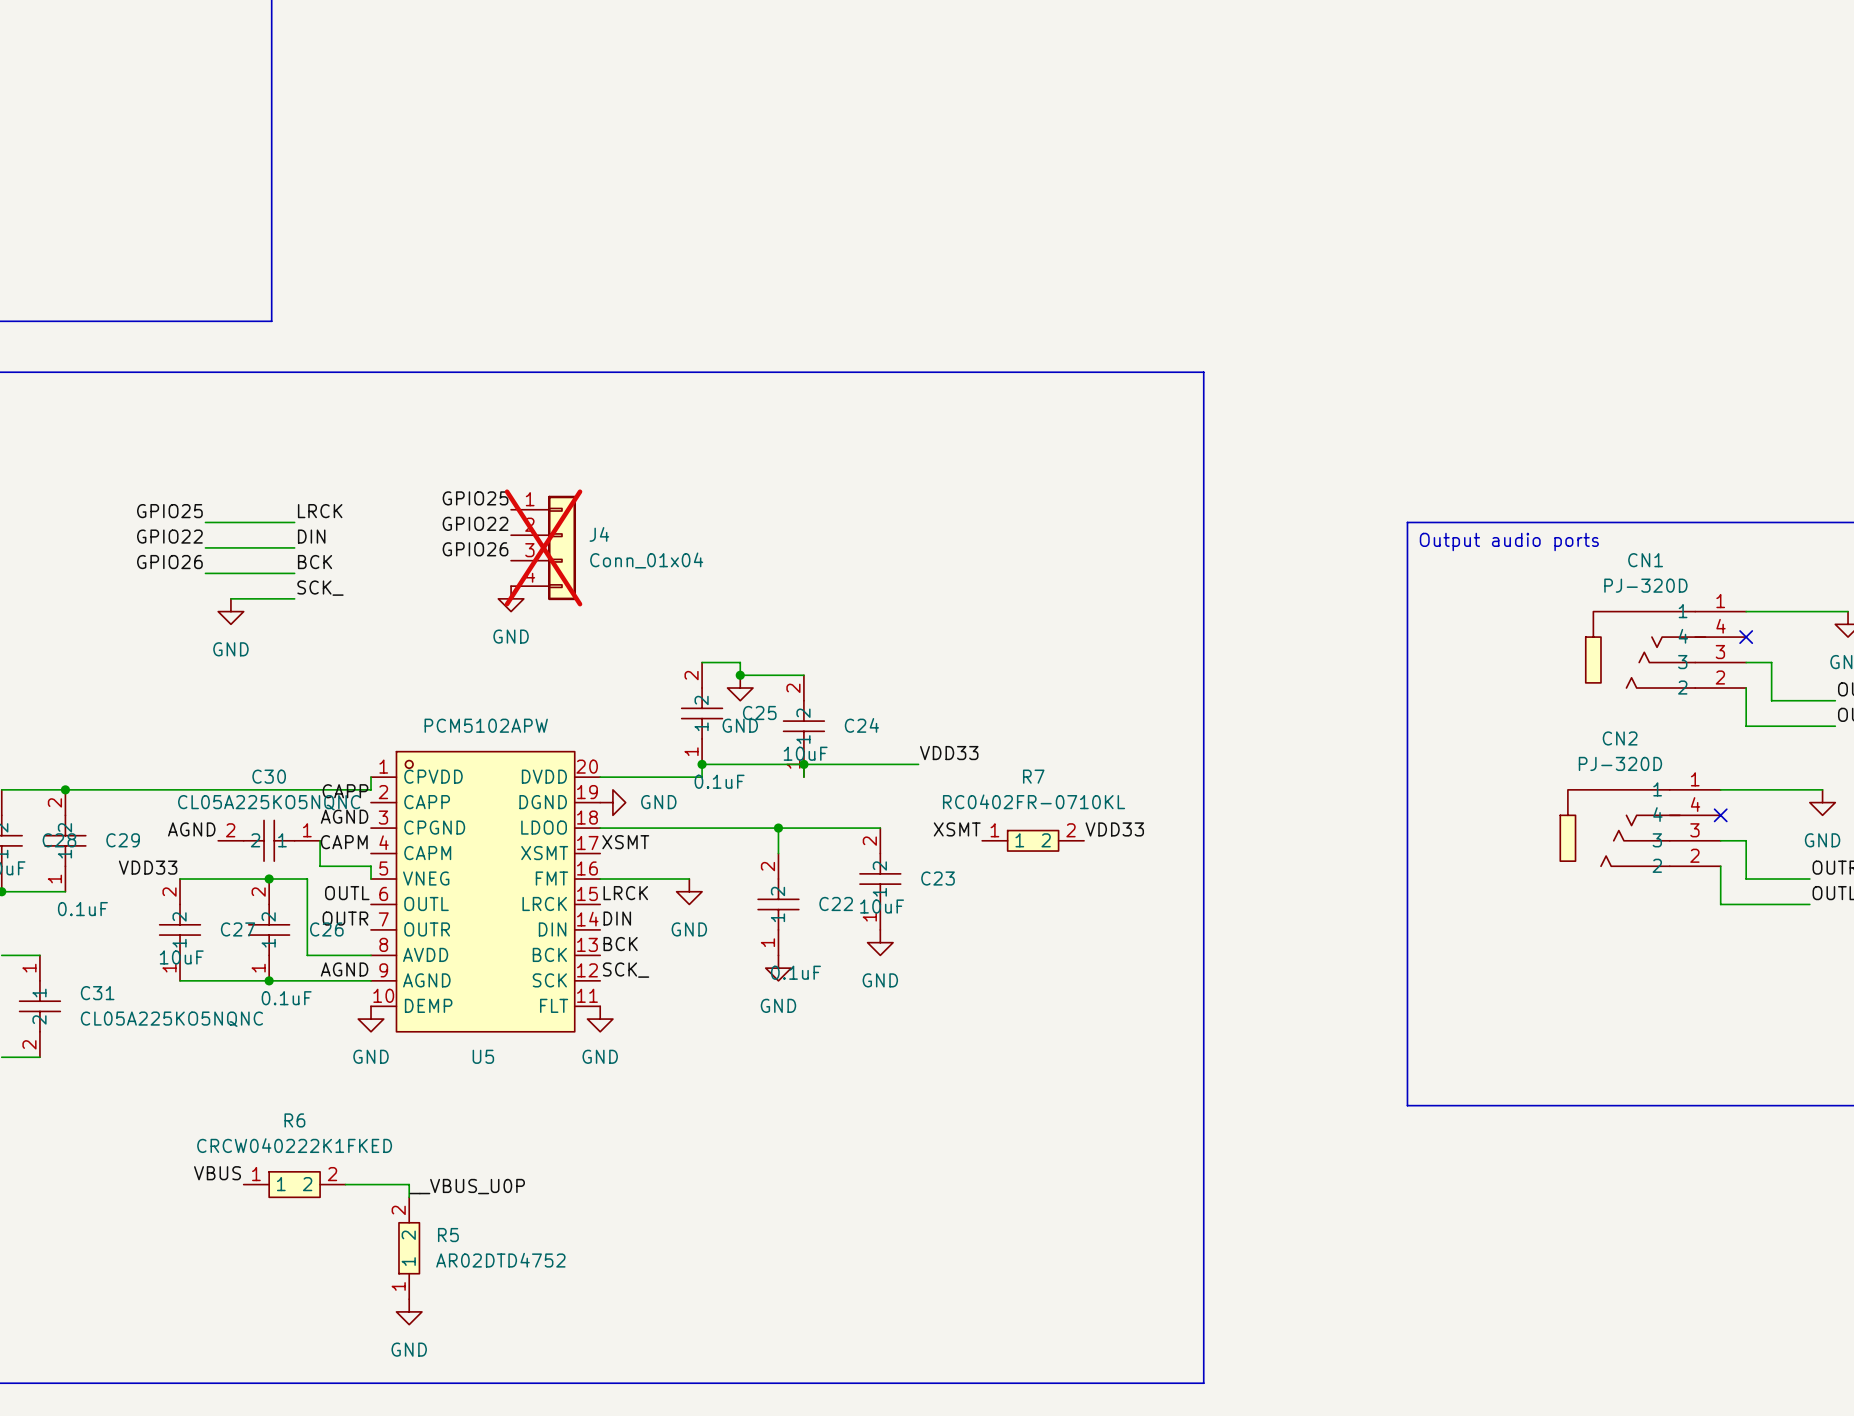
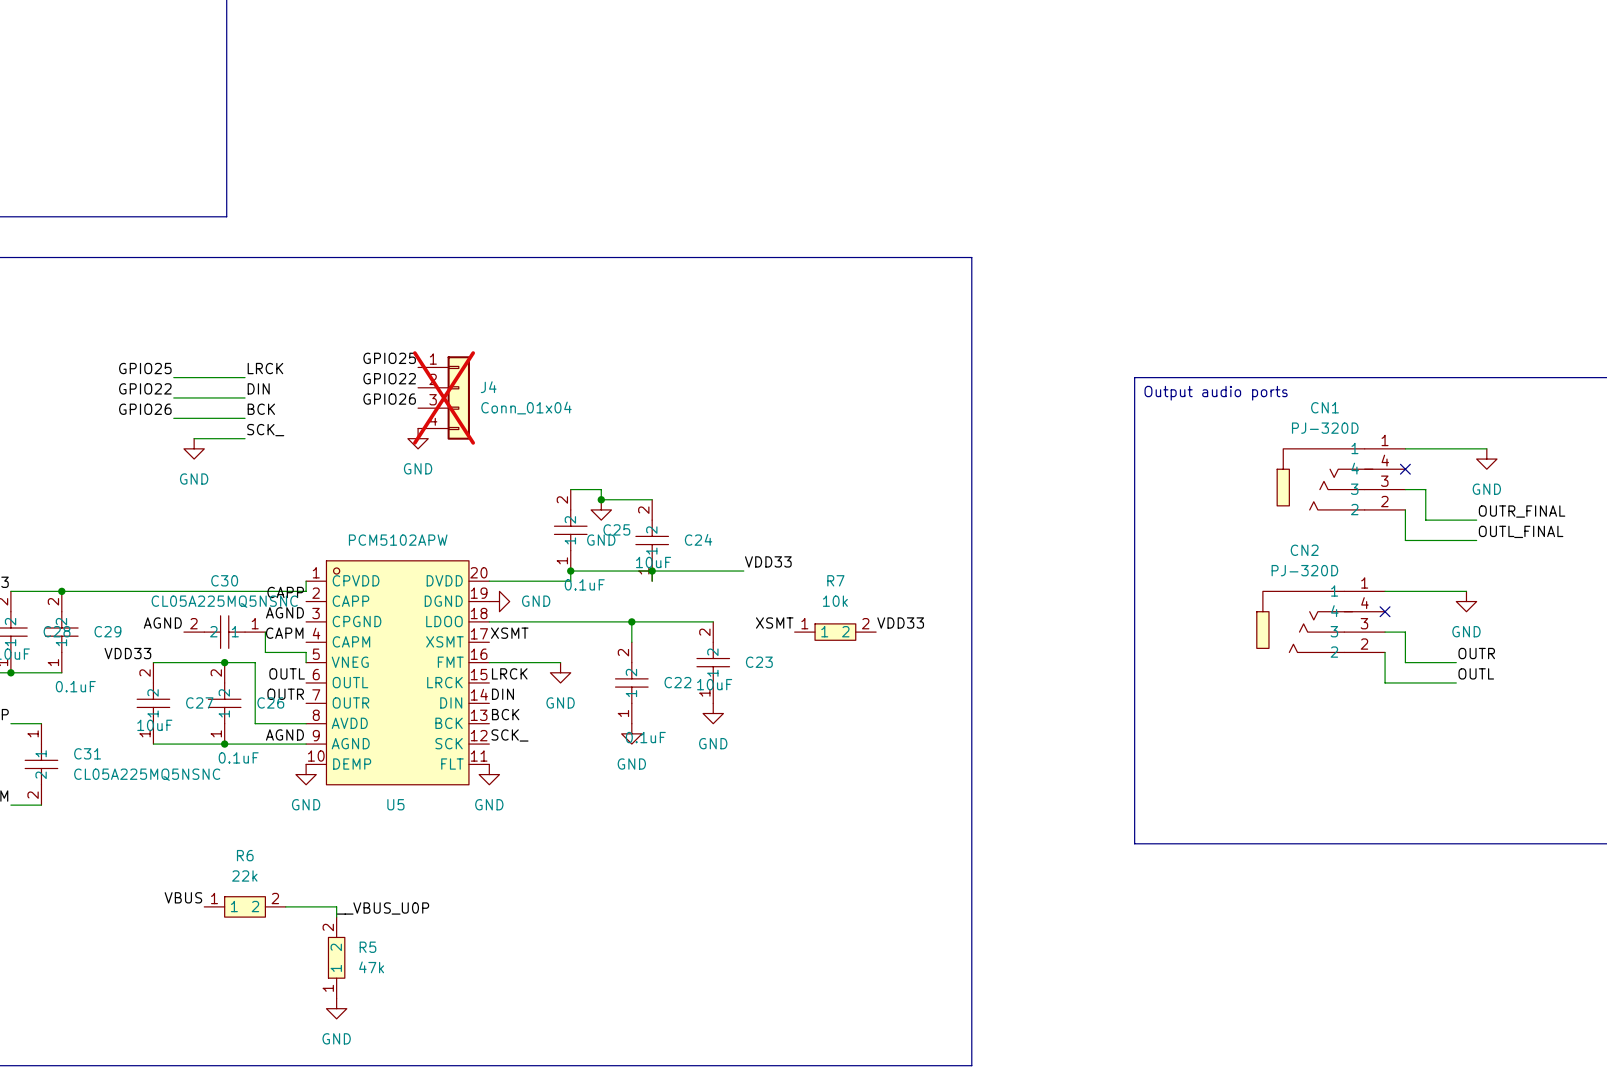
R7 value: RC0402FR-0710KL (1034, 801) -> 10k (835, 601)
C30 value: CL05A225KO5NQNC (269, 802) -> CL05A225MQ5NSNC (224, 601)
C31 value: CL05A225KO5NQNC (171, 1019) -> CL05A225MQ5NSNC (147, 774)
R6 value: CRCW040222K1FKED (294, 1145) -> 22k (244, 875)
R5 value: AR02DTD4752 (500, 1260) -> 47k (371, 967)

